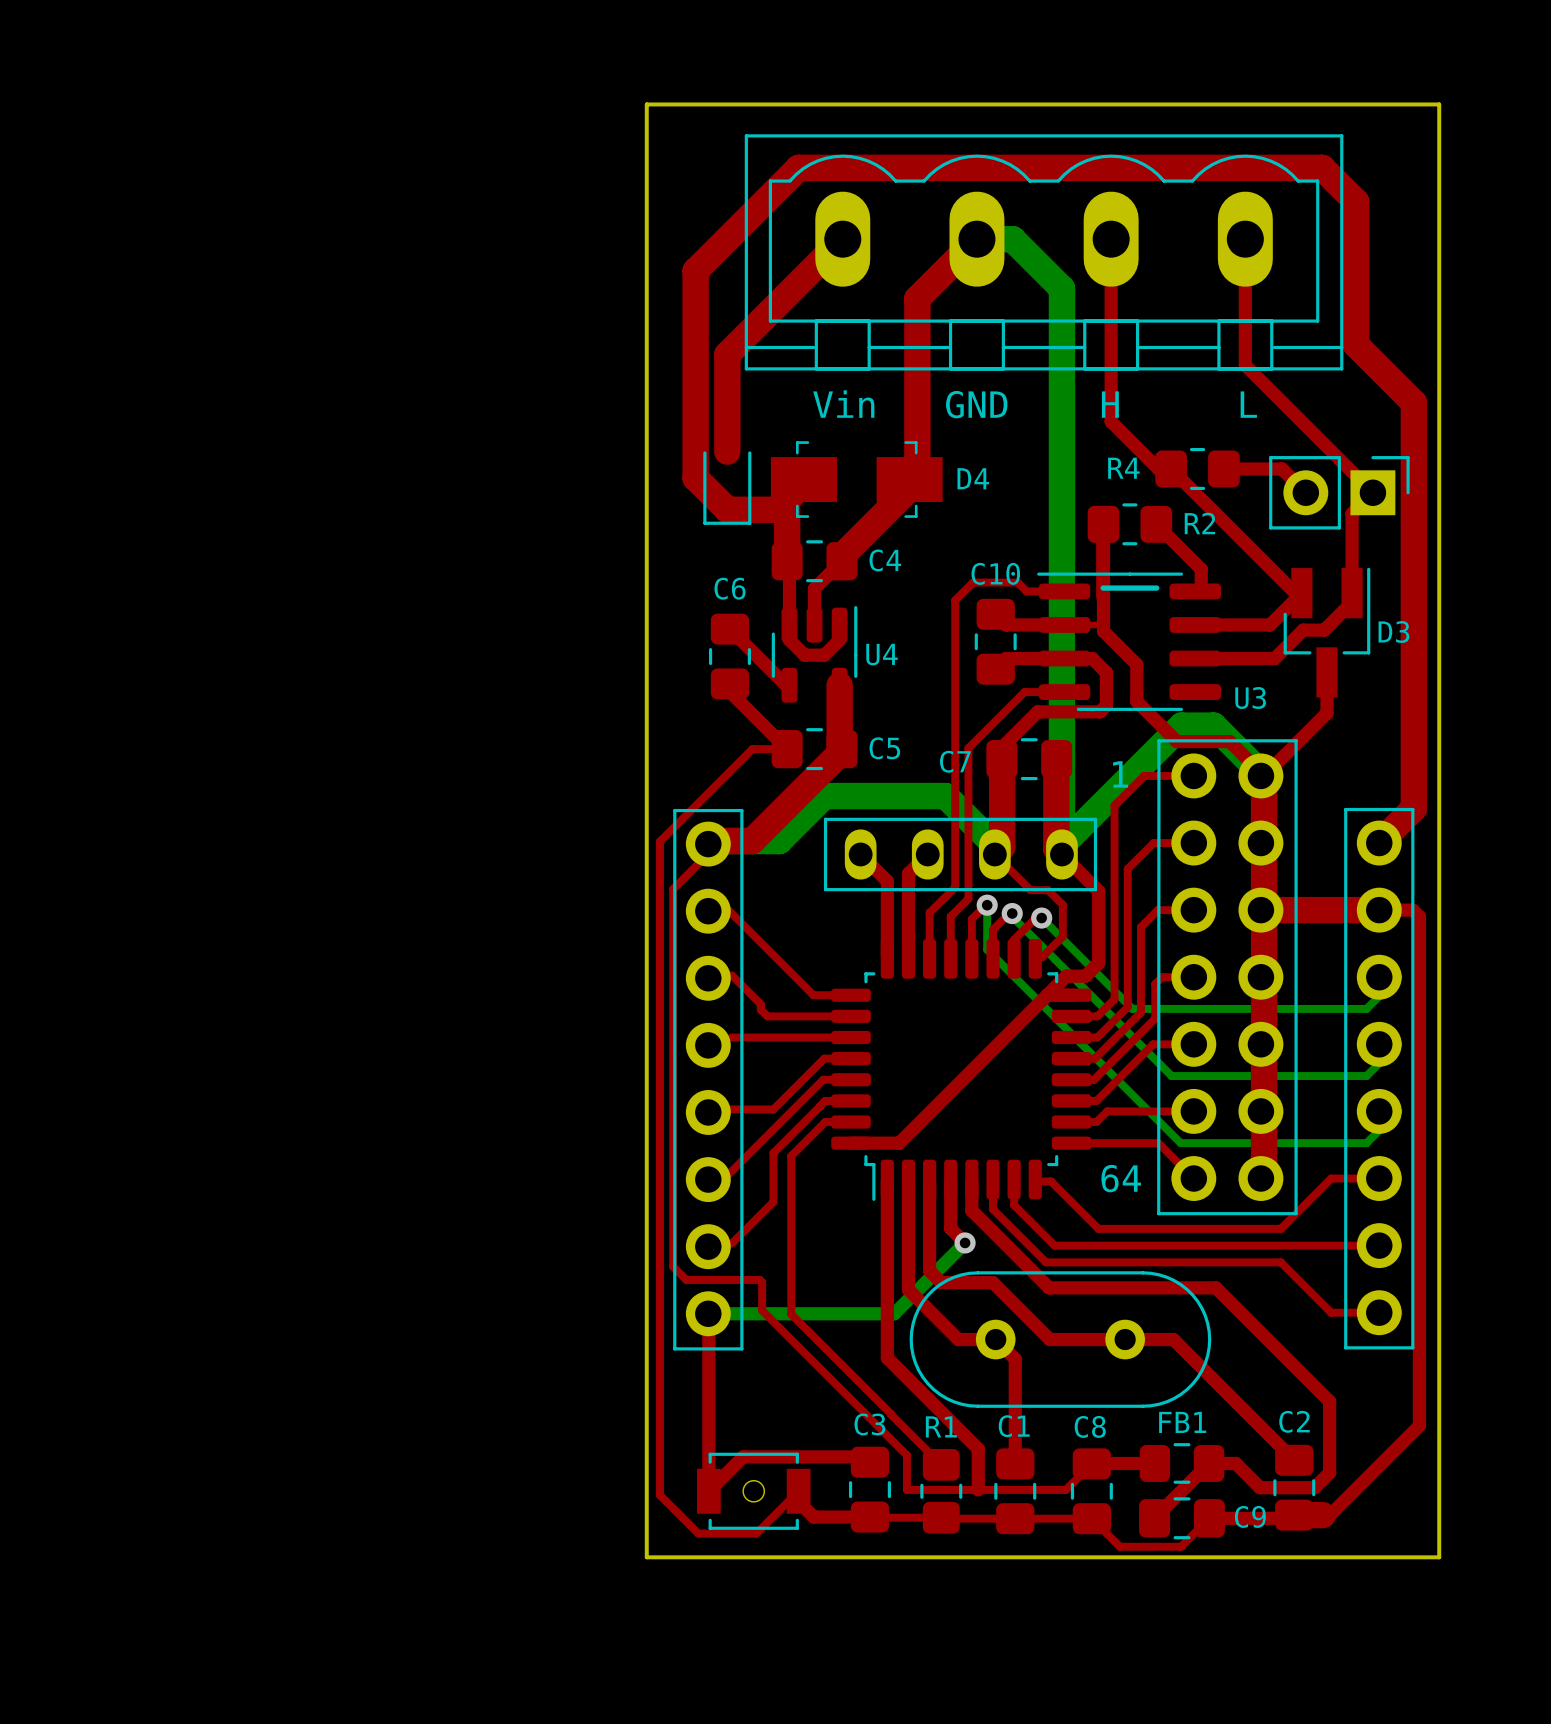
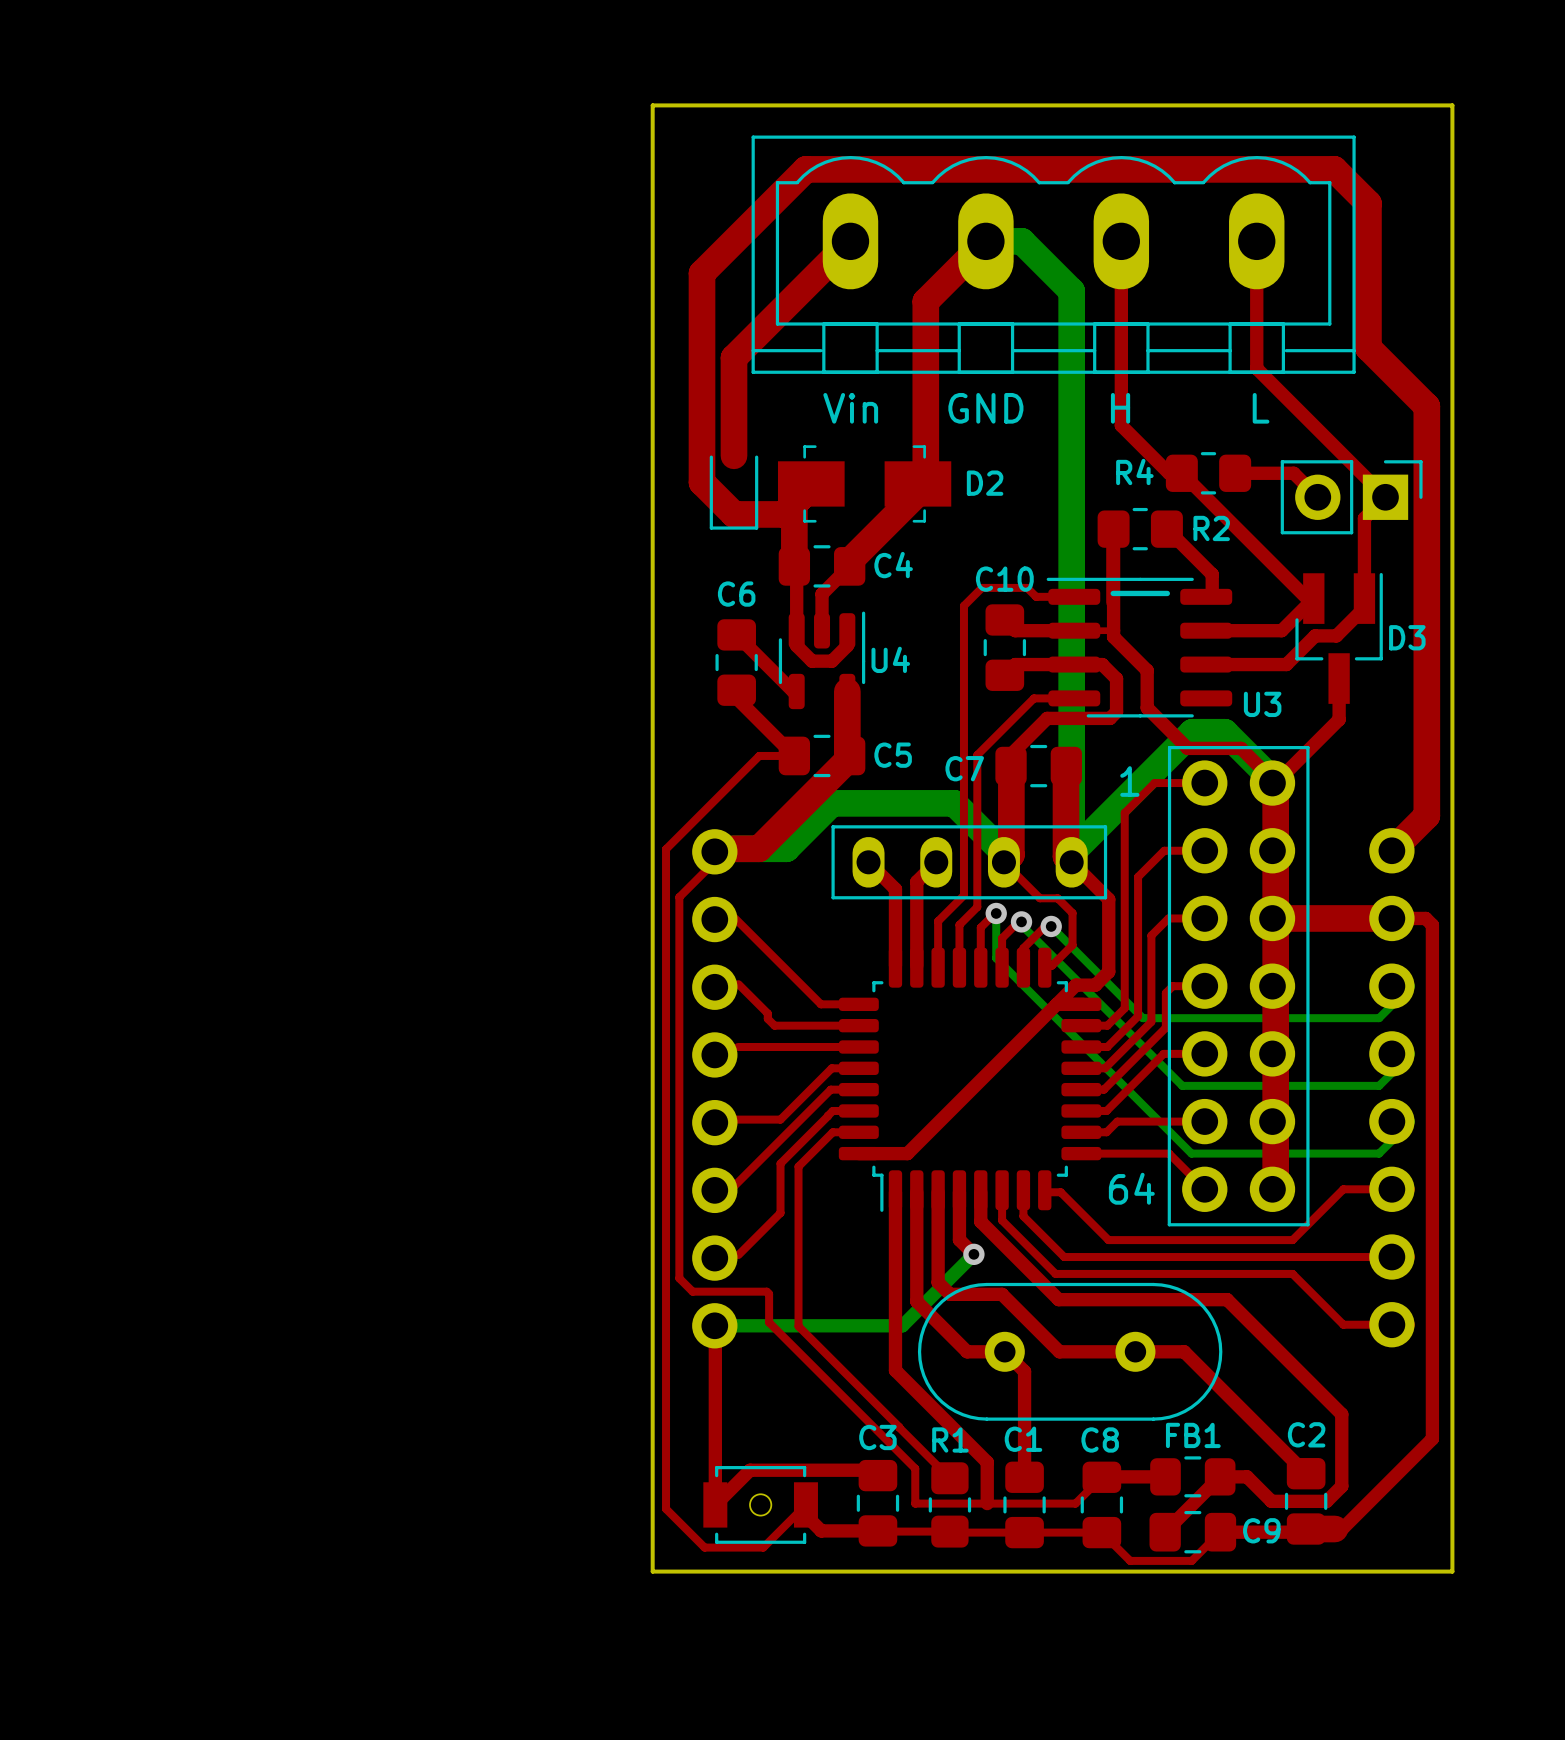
D4 name: D4 (973, 478) -> D2 (985, 483)
part side: top (1379, 1078) -> bottom (1391, 1087)
part side: top (708, 1079) -> bottom (714, 1088)

